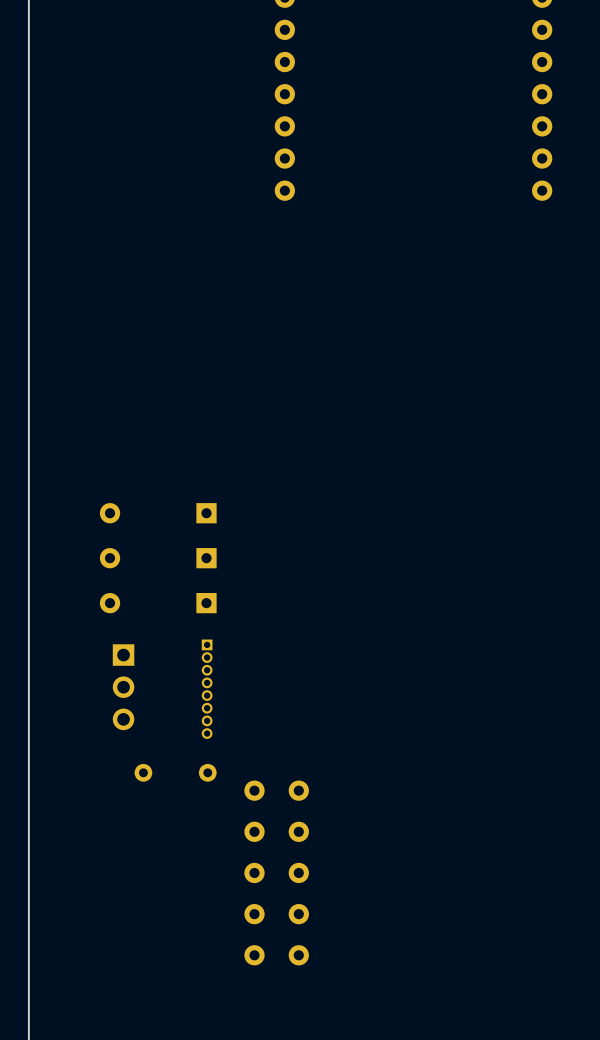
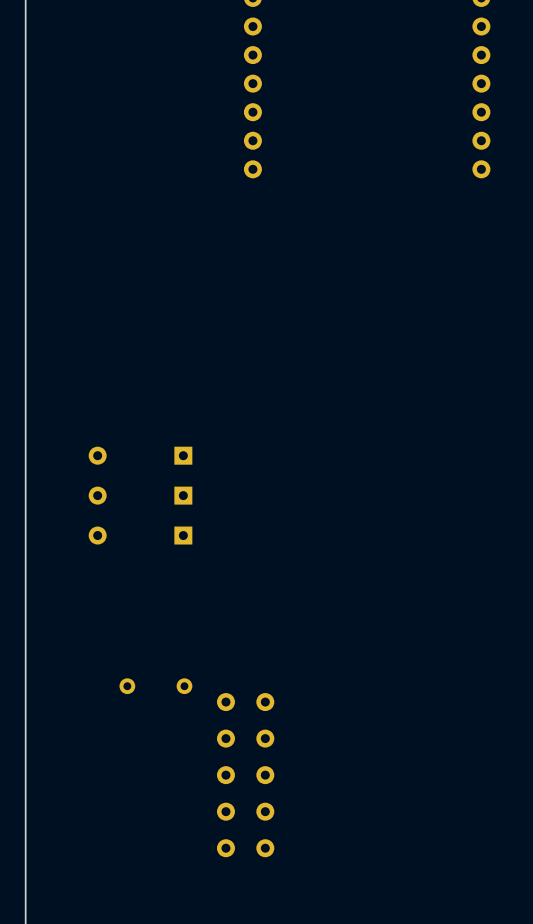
part: (123, 687) -> none
part: (207, 689) -> none

